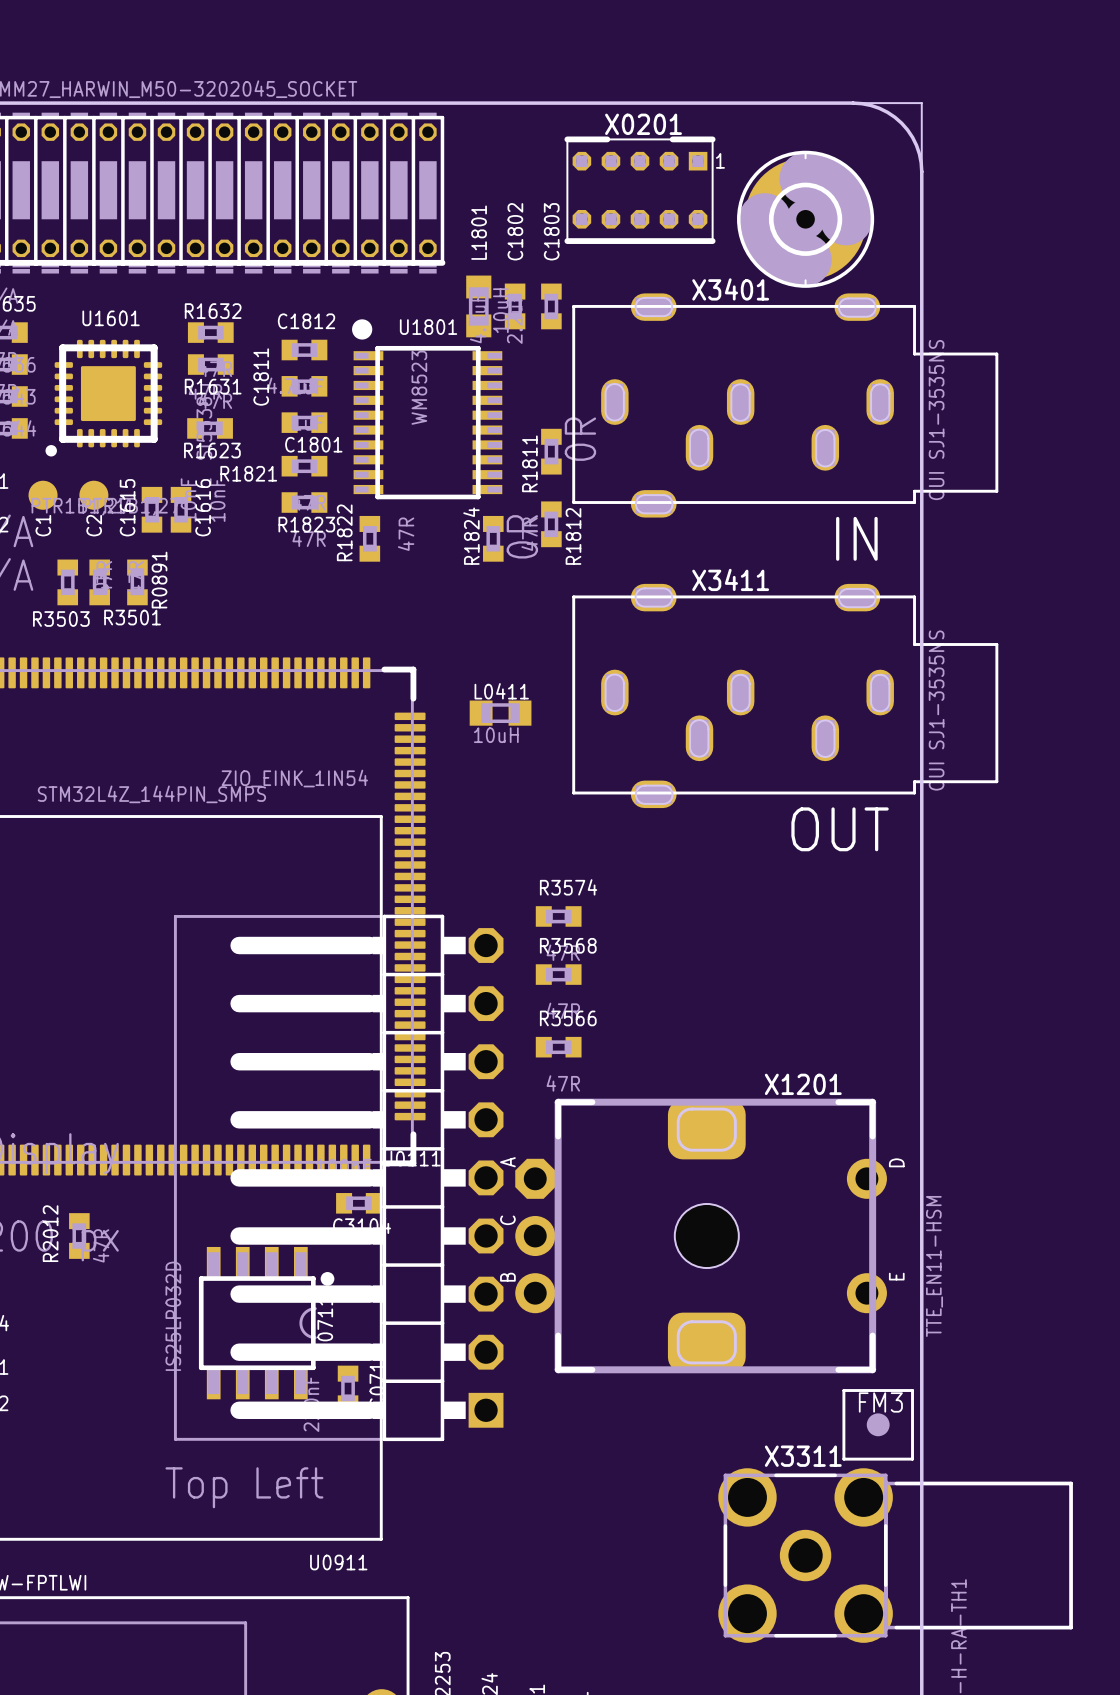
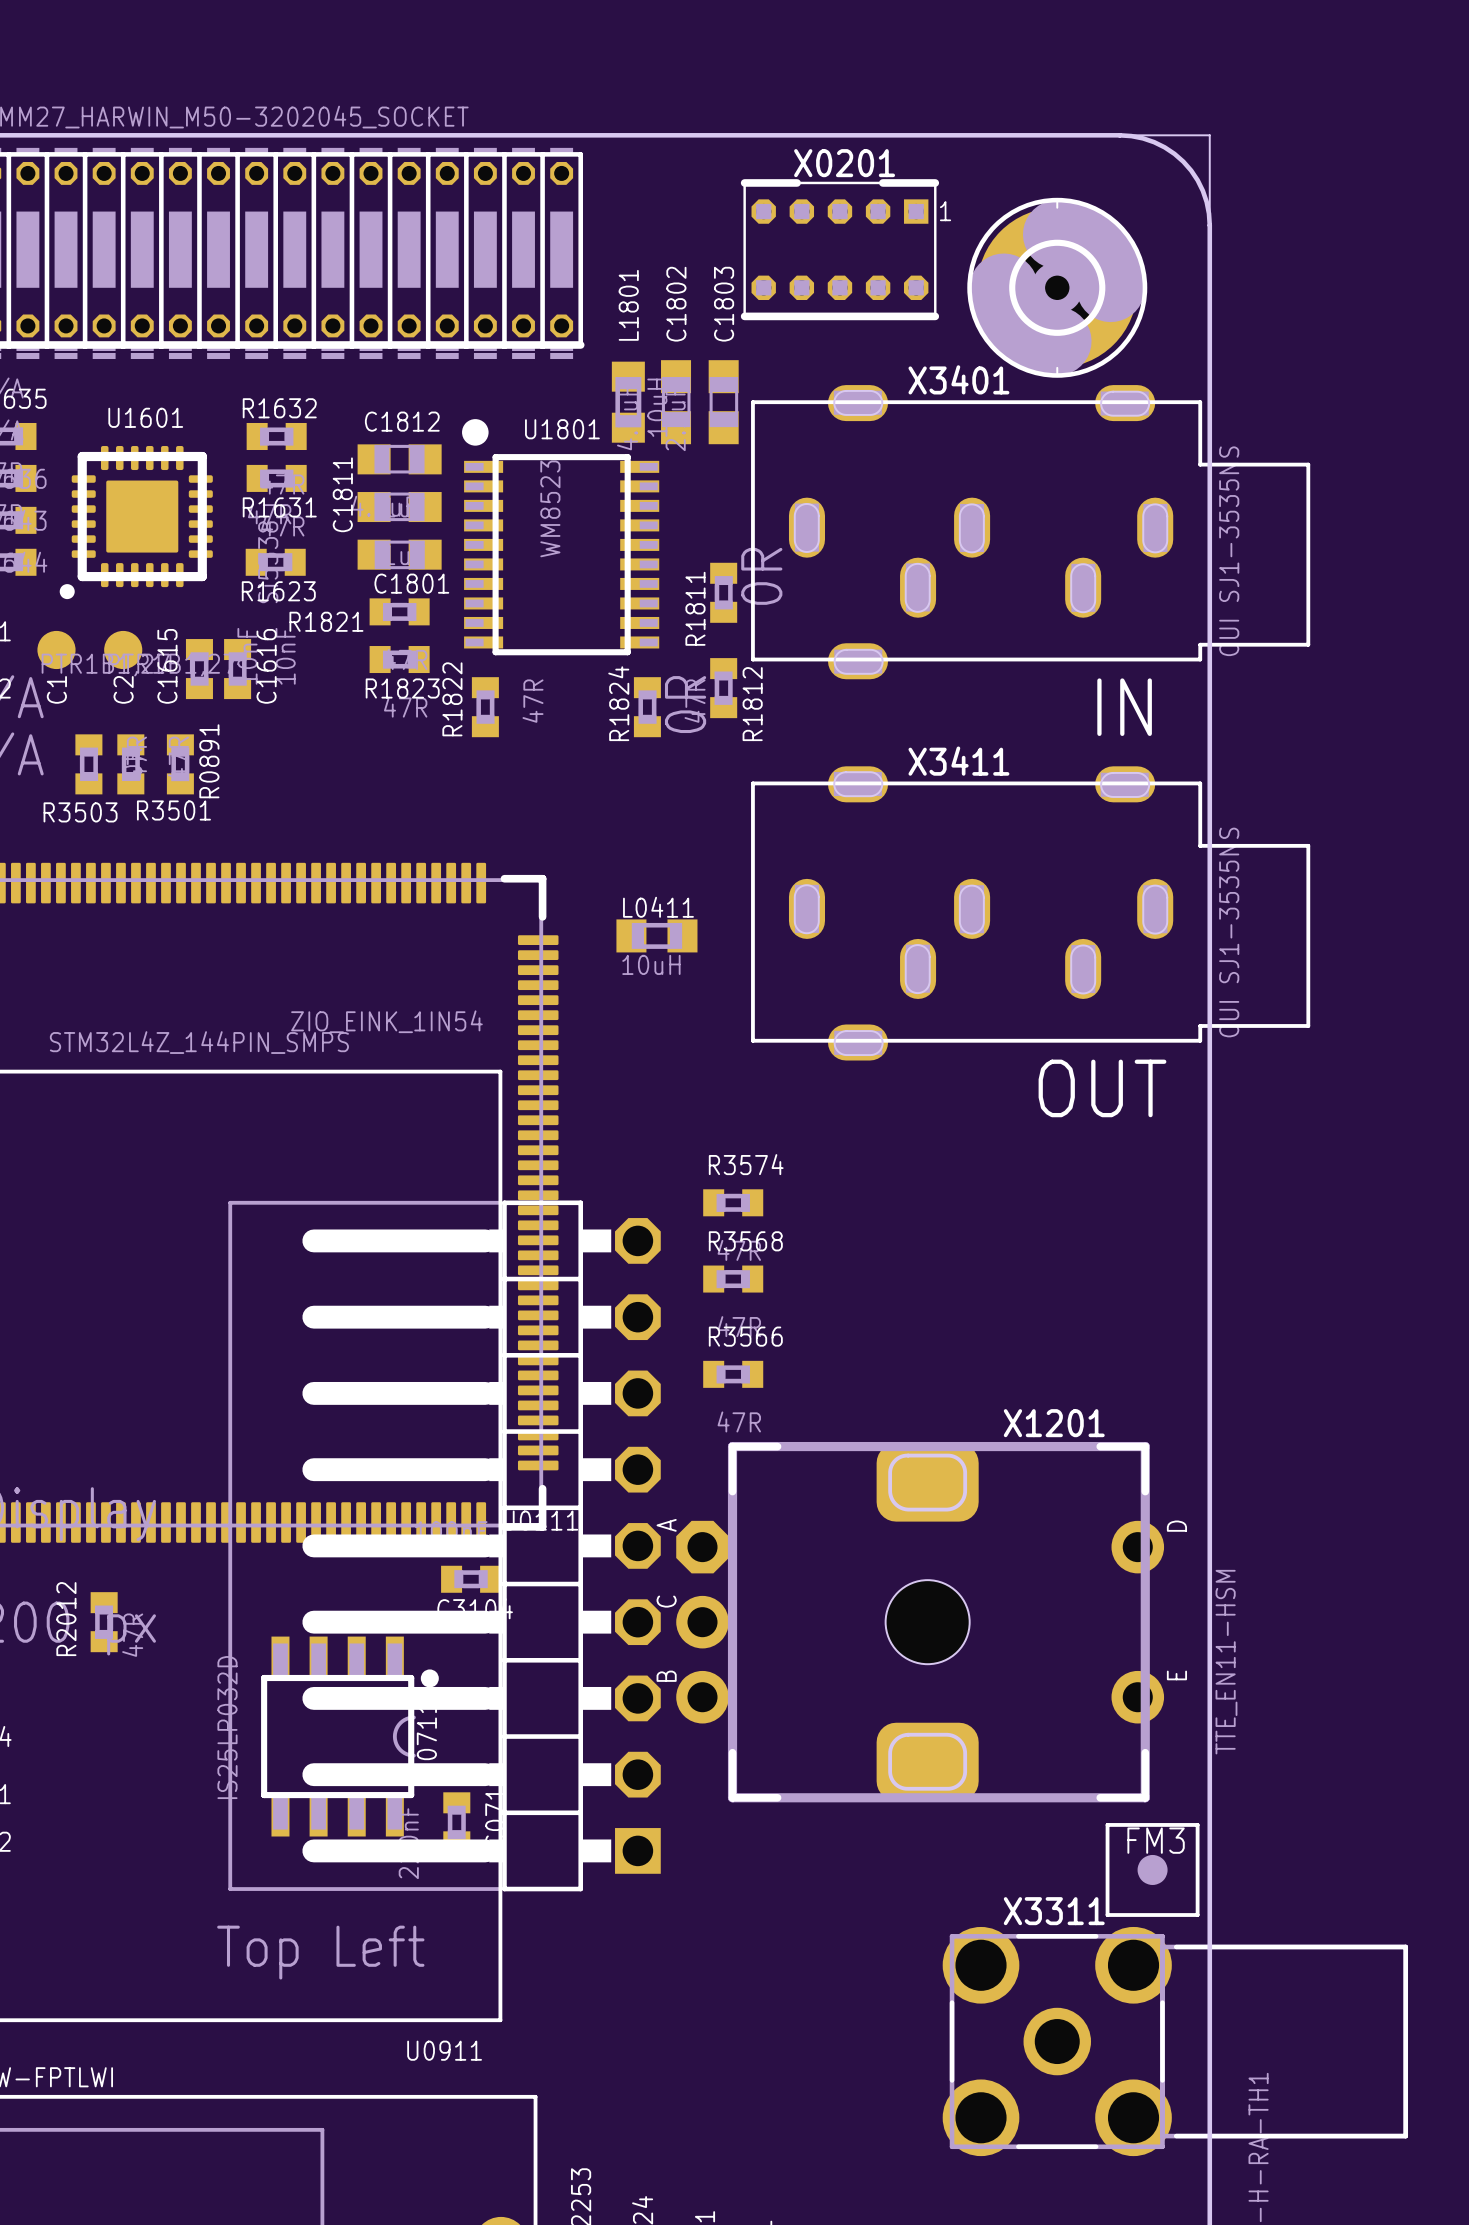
C1802 footprint: [504, 283, 526, 330] -> [661, 360, 692, 445]
C1803 footprint: [541, 283, 562, 330] -> [708, 360, 739, 445]
C1812 footprint: [281, 339, 328, 361] -> [357, 444, 442, 475]
C1811 footprint: [281, 376, 328, 397] -> [357, 492, 442, 523]
C1801 footprint: [281, 412, 328, 433] -> [357, 539, 442, 570]

